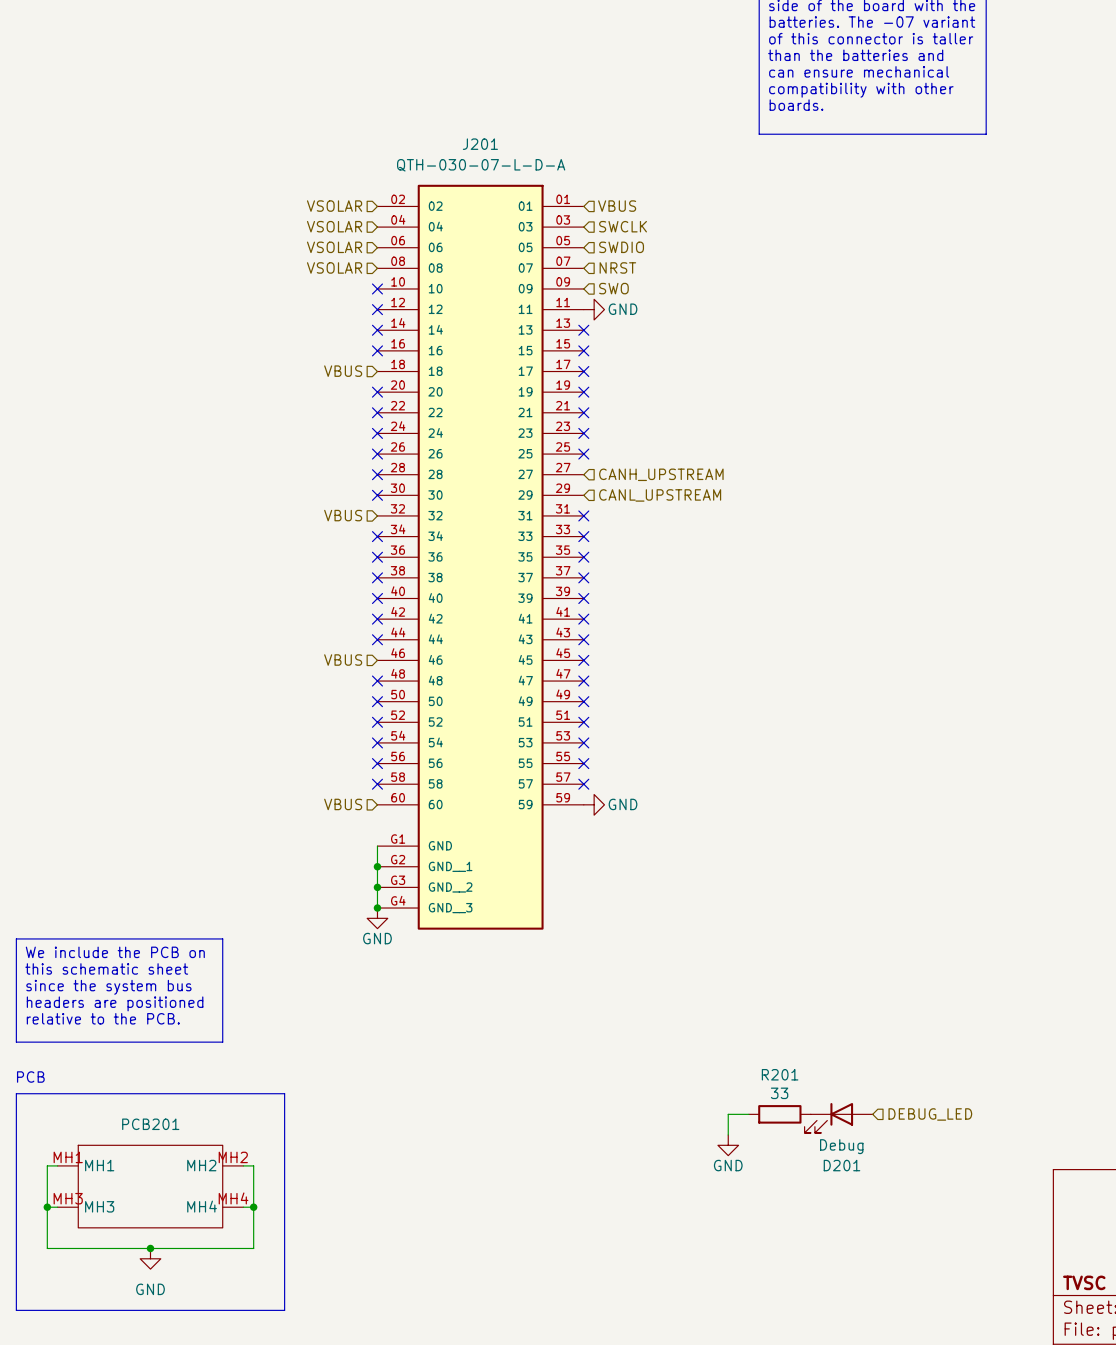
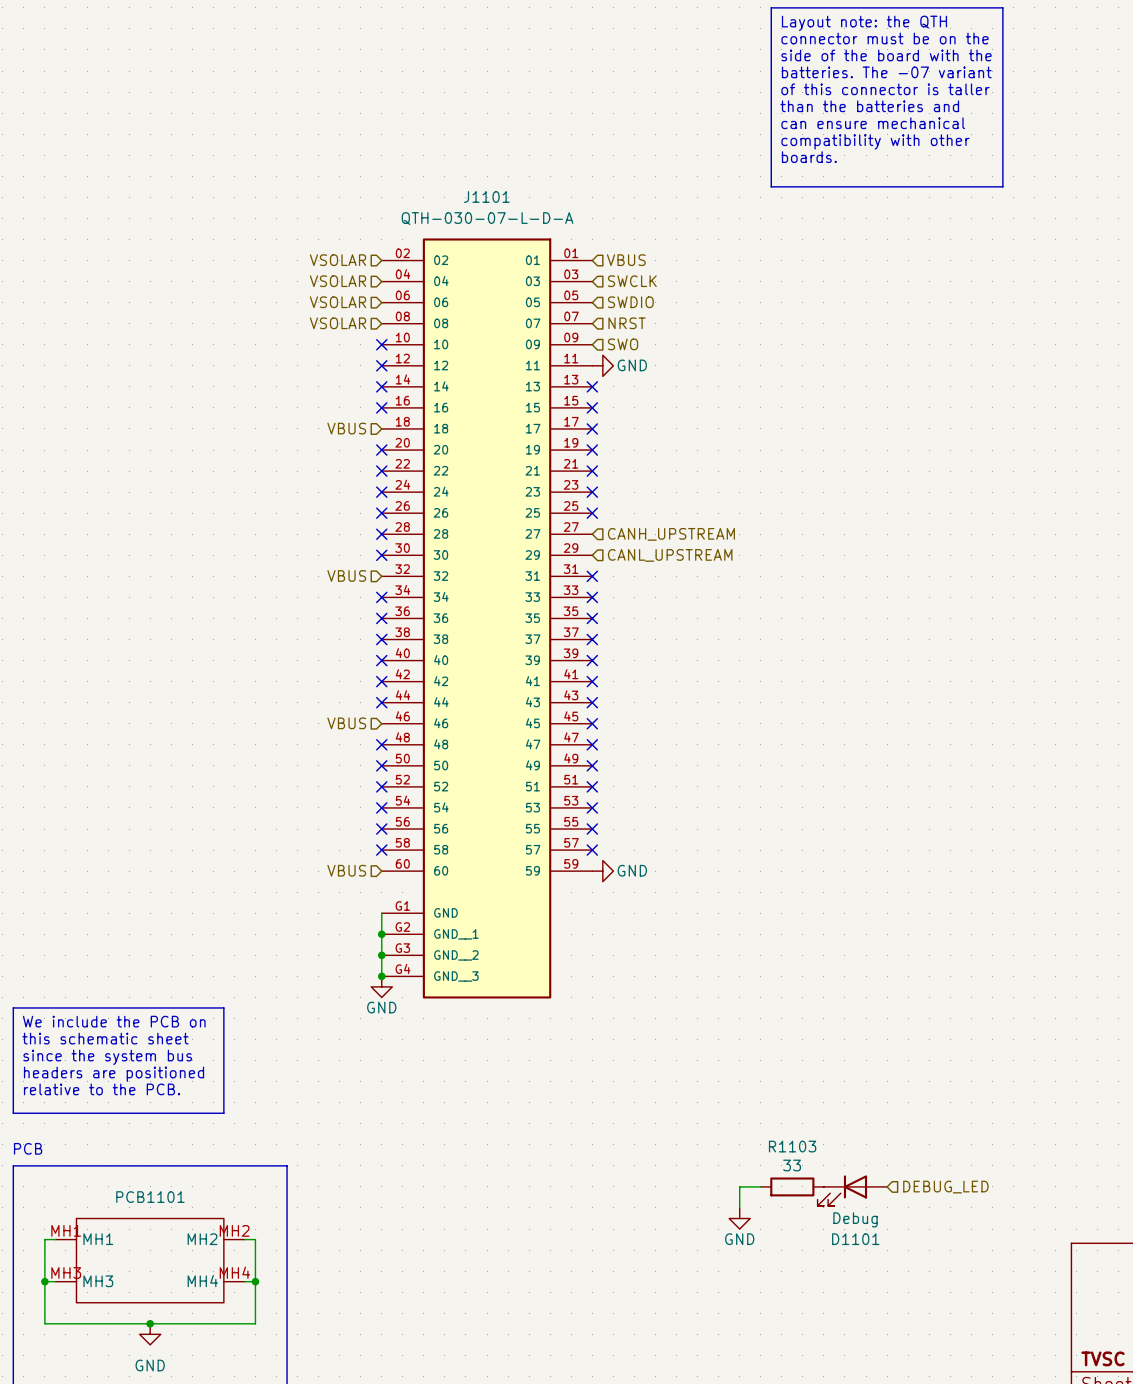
J201 name: J201 (480, 144) -> J1101 (486, 196)
R201 name: R201 (780, 1074) -> R1103 (792, 1146)
PCB201 name: PCB201 (150, 1124) -> PCB1101 (150, 1197)
D201 name: D201 (841, 1165) -> D1101 (855, 1239)

